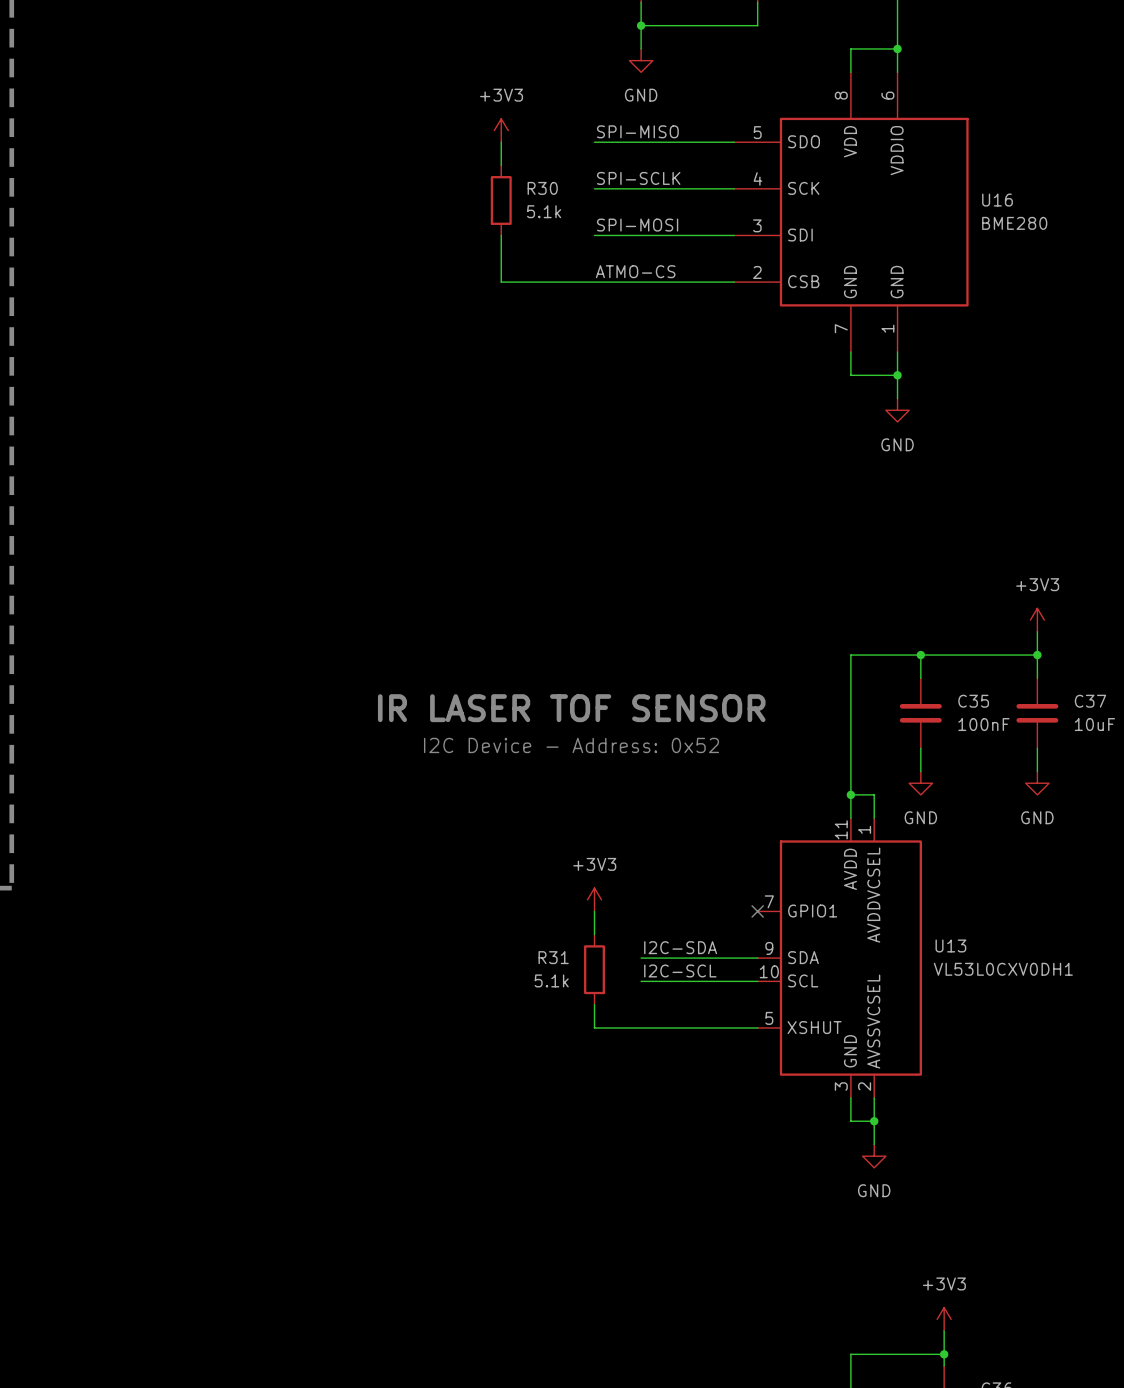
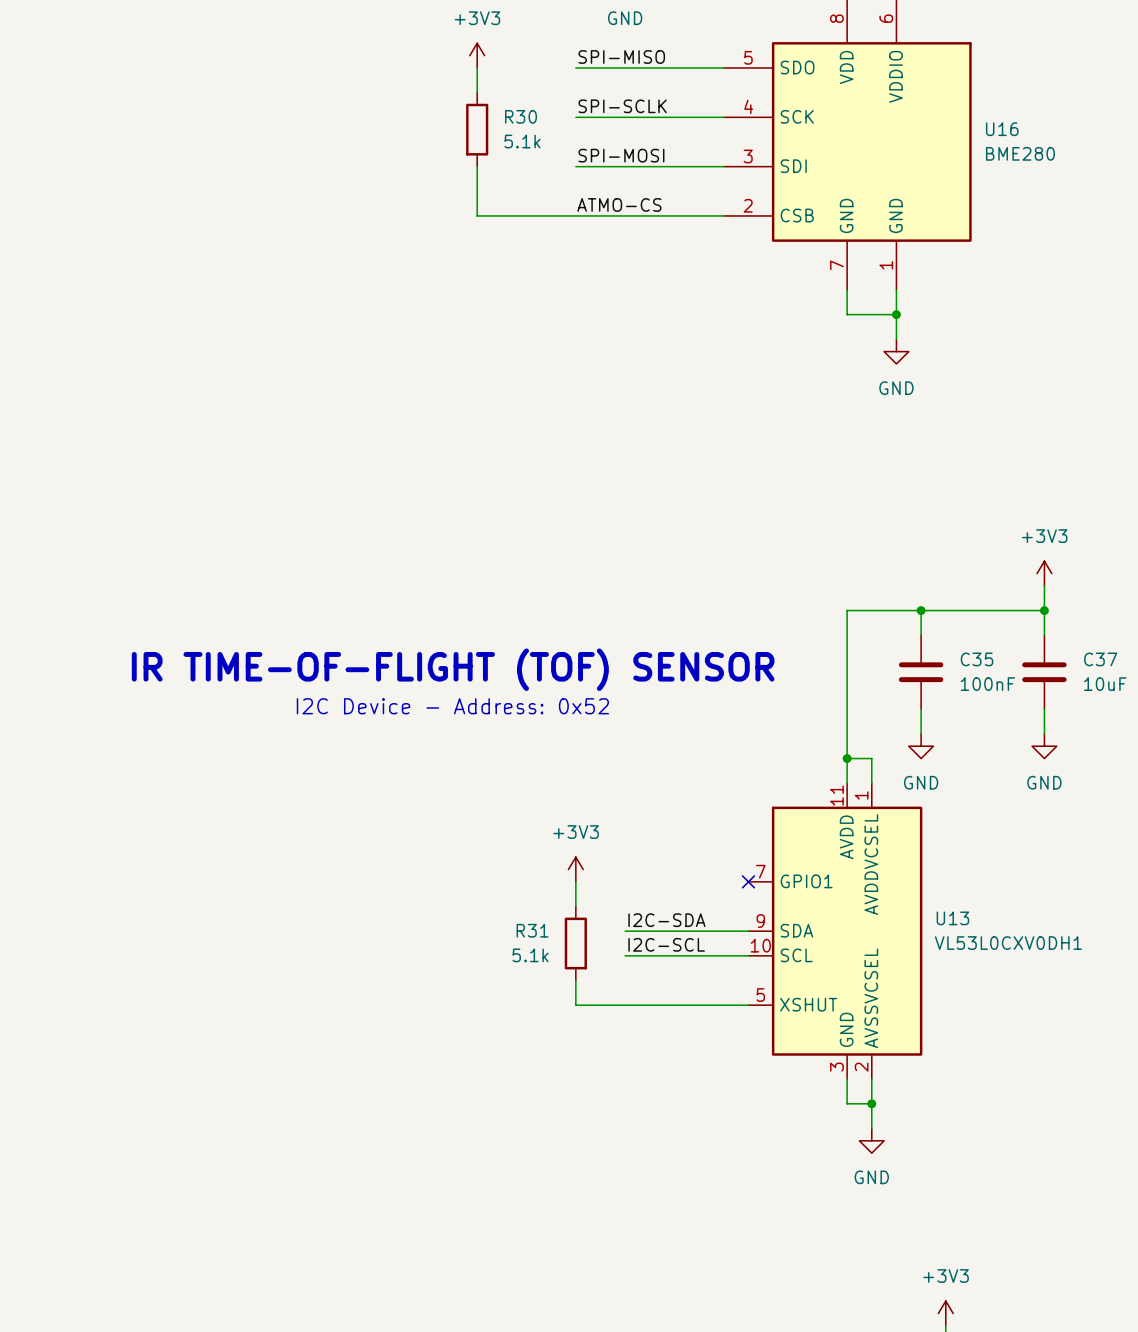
text: IR LASER TOF SENSOR (571, 708) -> IR TIME-OF-FLIGHT (TOF) SENSOR (453, 669)
text position: I2C Device - Address: 0x52 (571, 745) -> I2C Device - Address: 0x52 (452, 706)

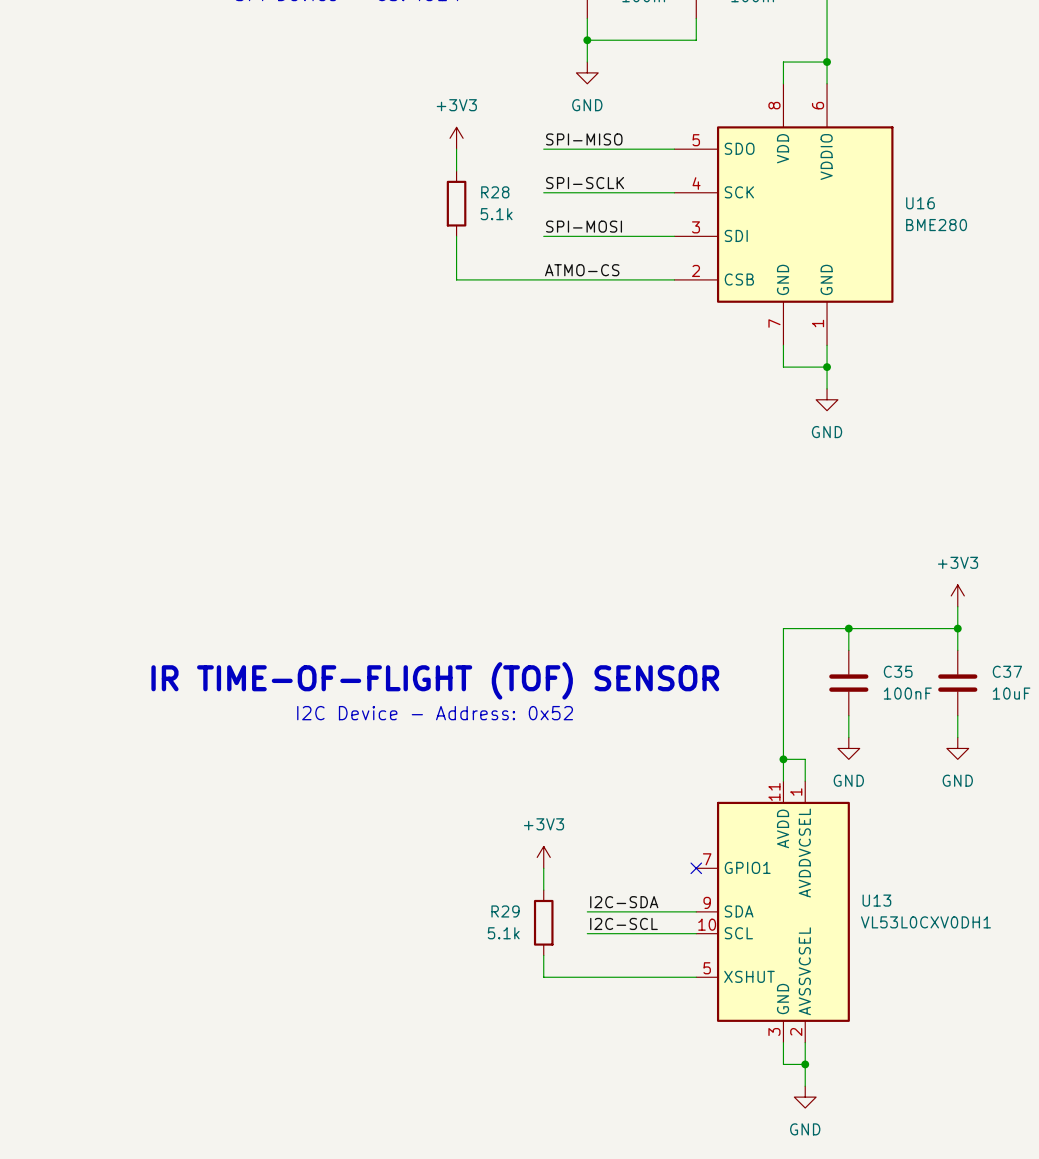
R30 name: R30 (521, 116) -> R28 (495, 192)
R31 name: R31 (532, 930) -> R29 (505, 911)

